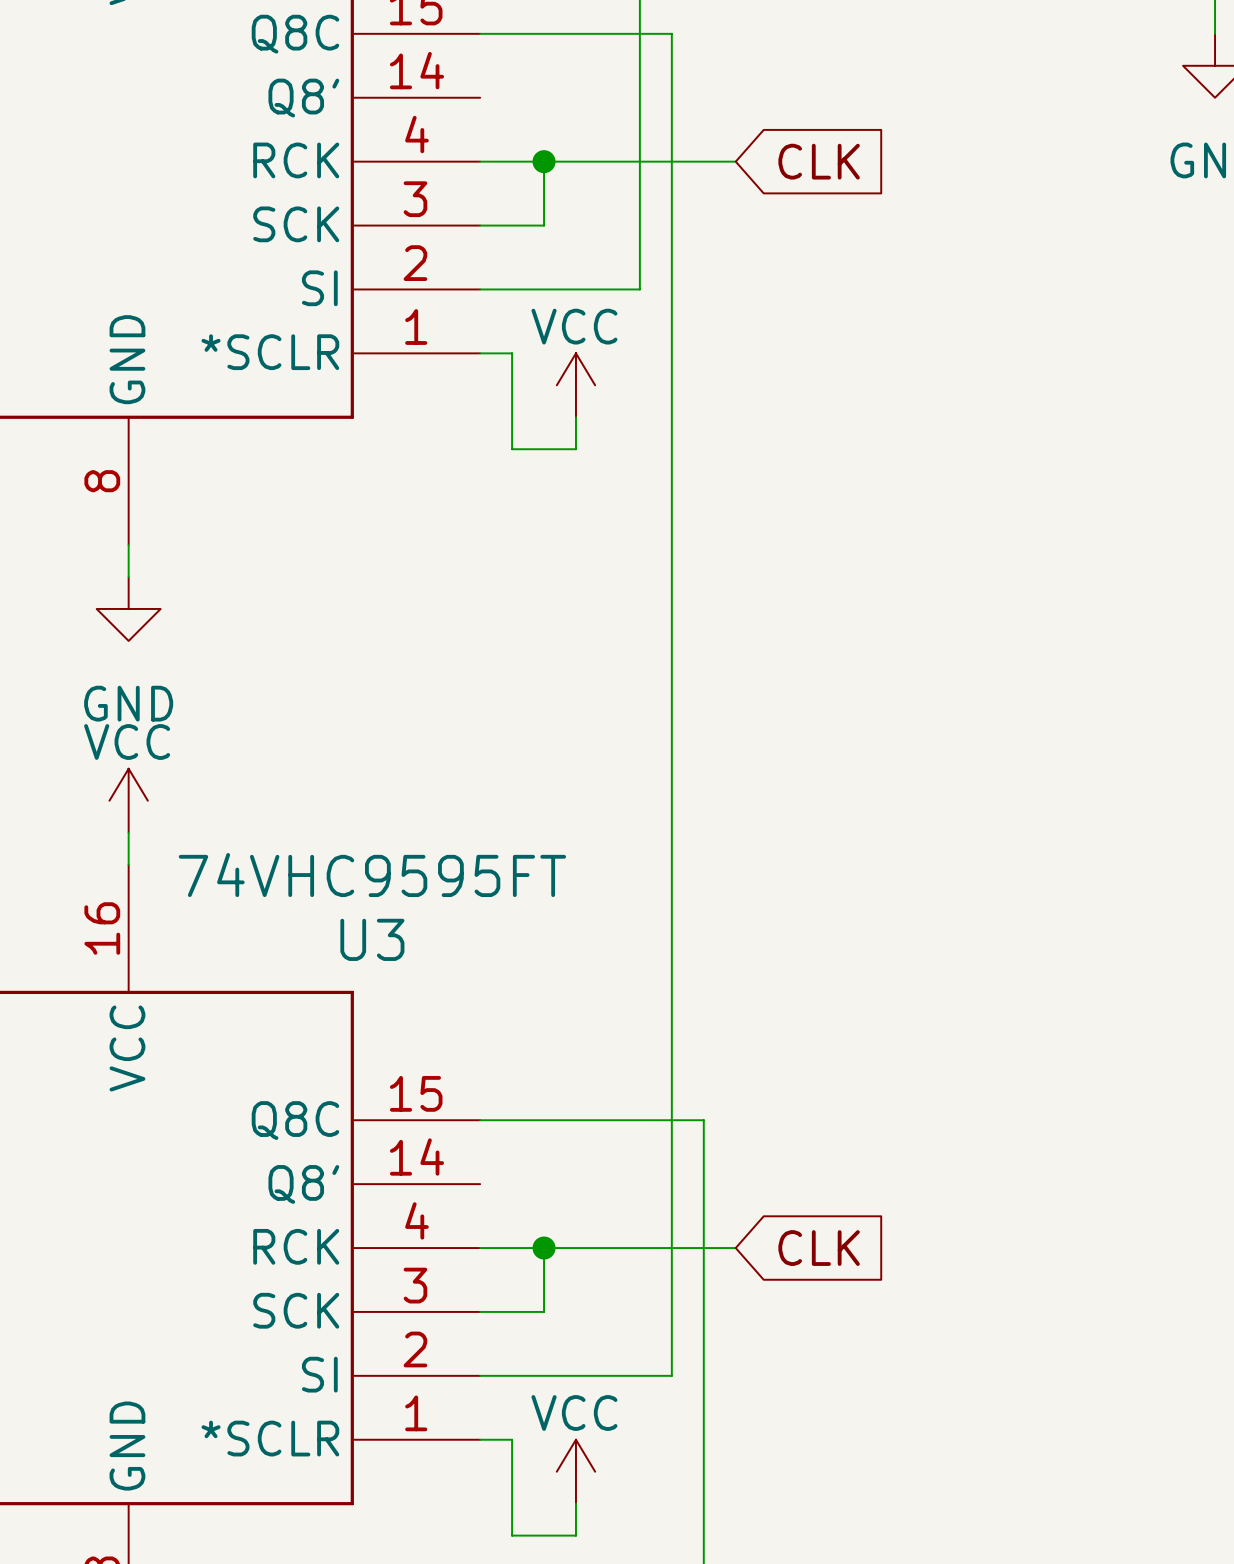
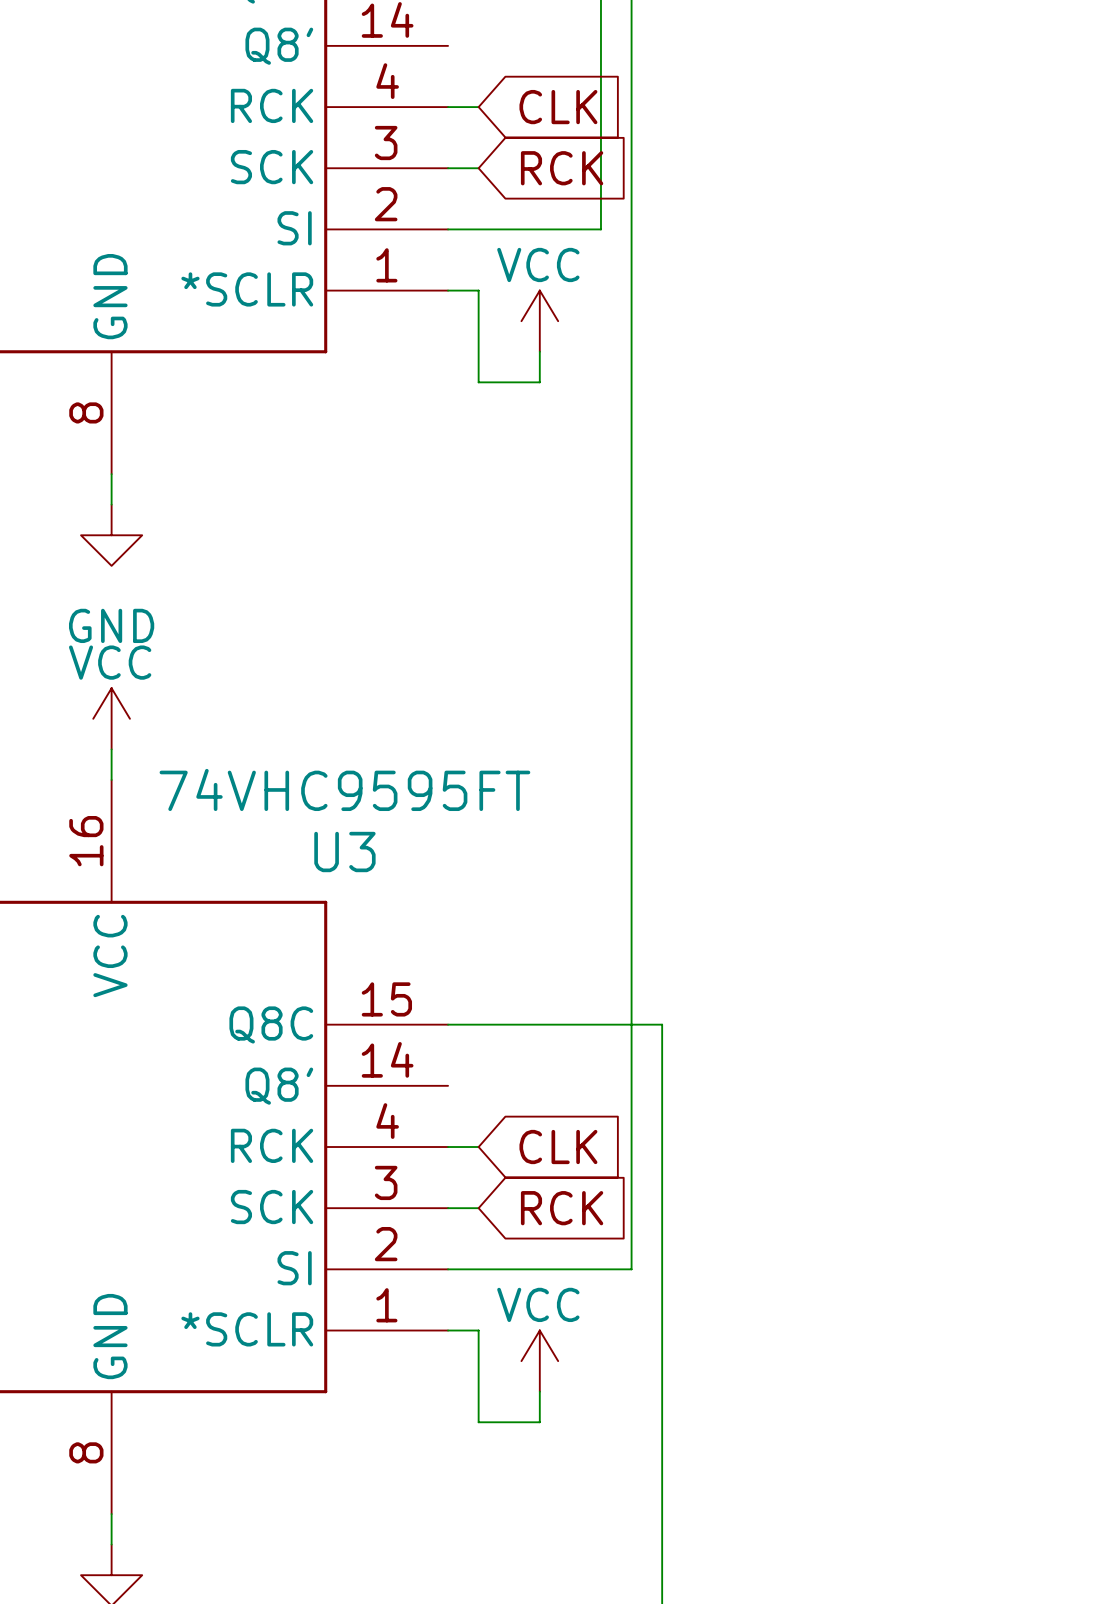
wire: (512, 161) (735, 161) -> none
wire: (544, 161) (544, 225) (512, 225) -> none
junction: (544, 161) -> none
global label position: CLK (819, 161) -> CLK (558, 107)
global label: none -> RCK (562, 168)
wire: (512, 1248) (735, 1248) -> none
wire: (544, 1248) (544, 1311) (512, 1311) -> none
junction: (544, 1248) -> none
global label position: CLK (819, 1248) -> CLK (558, 1147)
global label: none -> RCK (562, 1208)

